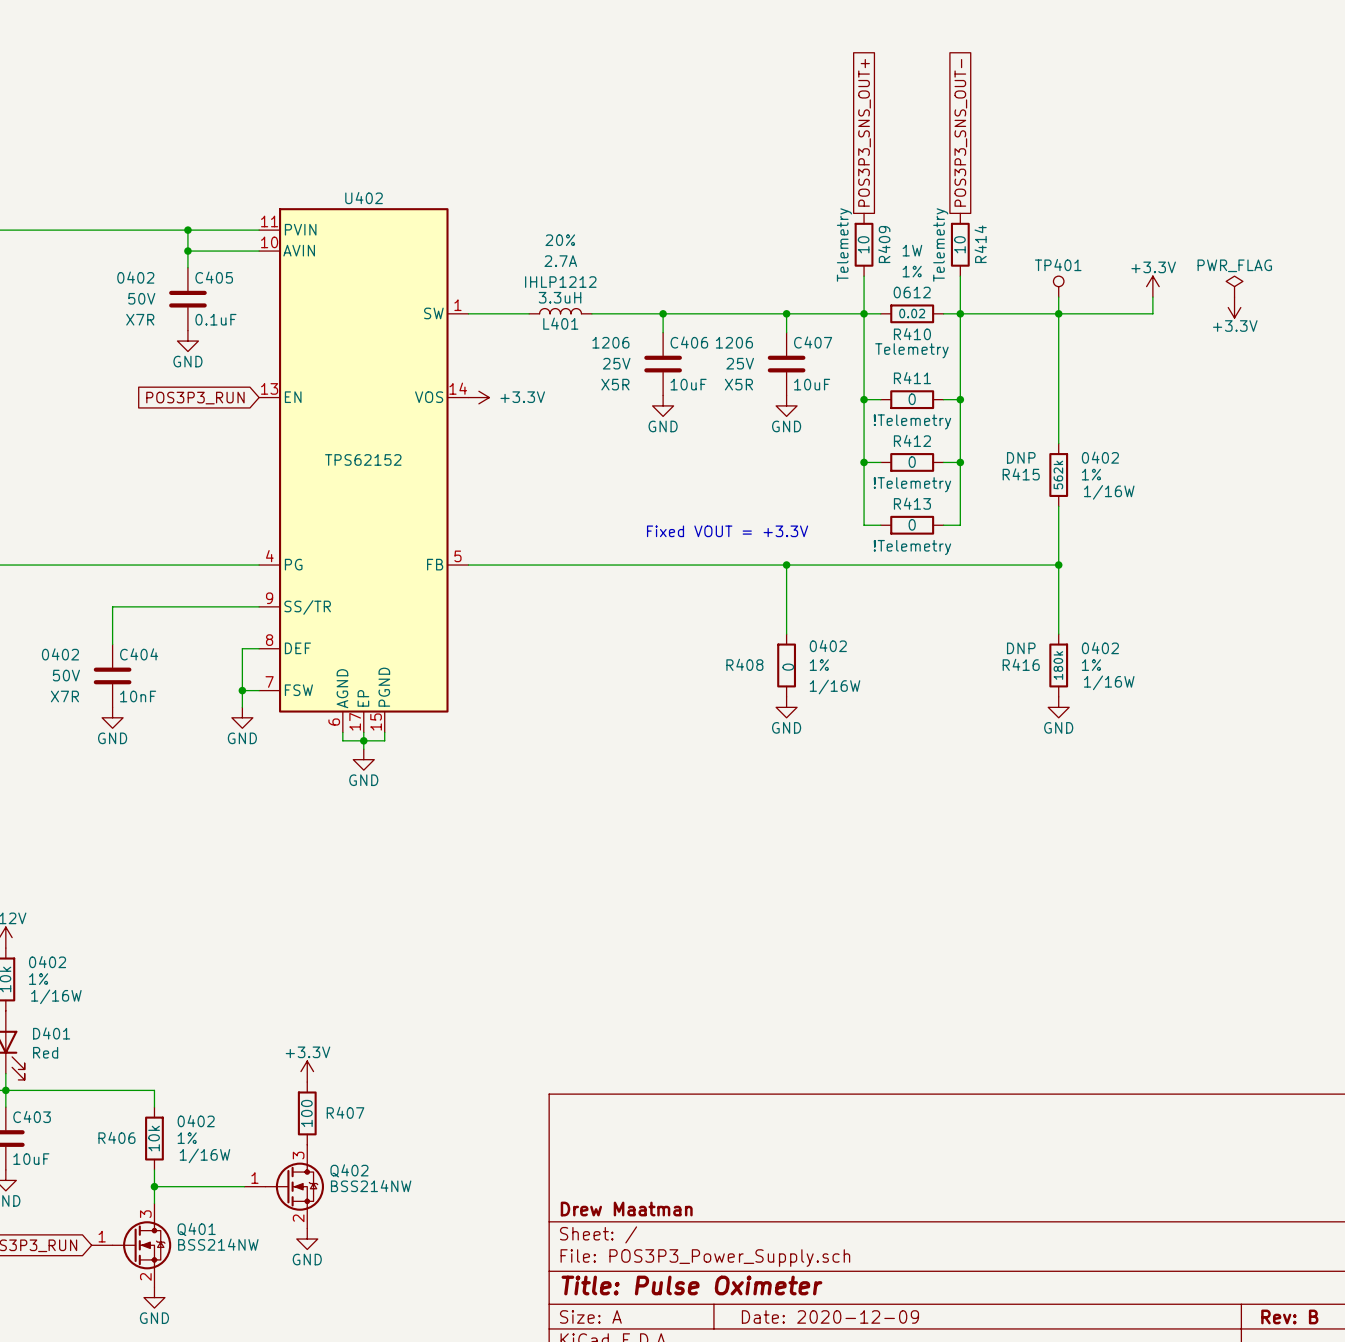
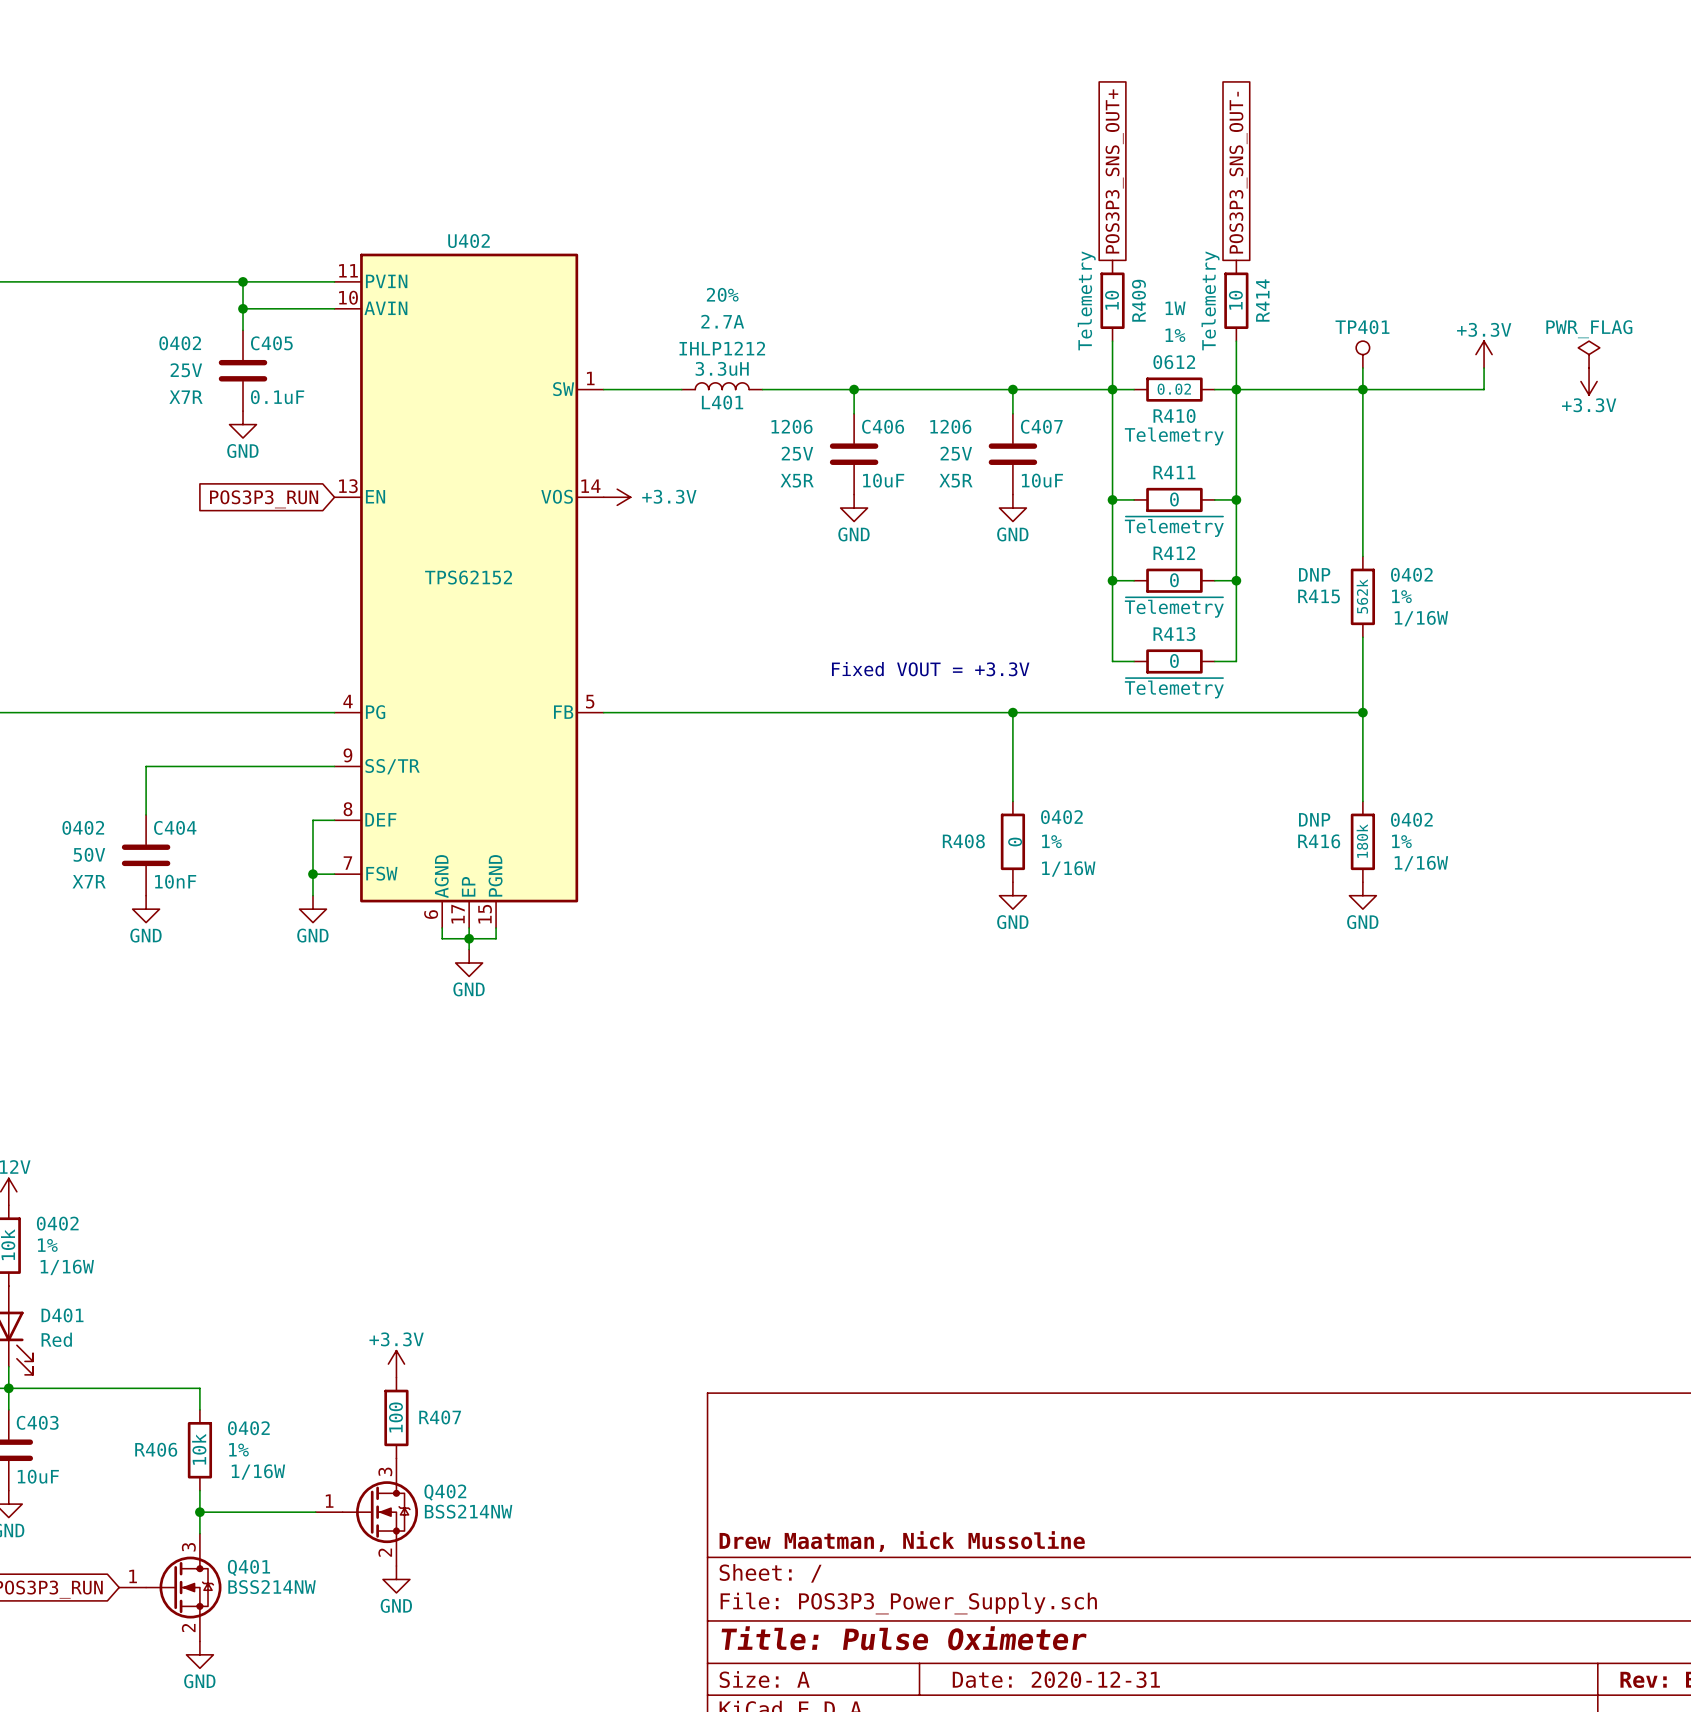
C405 text: 50V (141, 298) -> 25V (186, 370)
R411 text: !Telemetry (912, 421) -> ~{Telemetry} (1174, 526)
R412 text: !Telemetry (912, 484) -> ~{Telemetry} (1174, 607)
R413 text: !Telemetry (912, 547) -> ~{Telemetry} (1174, 688)
title block: Drew Maatman (626, 1209) -> Drew Maatman, Nick Mussoline (902, 1541)
title block: Date: 2020-12-09 (830, 1316) -> Date: 2020-12-31 (1056, 1679)

